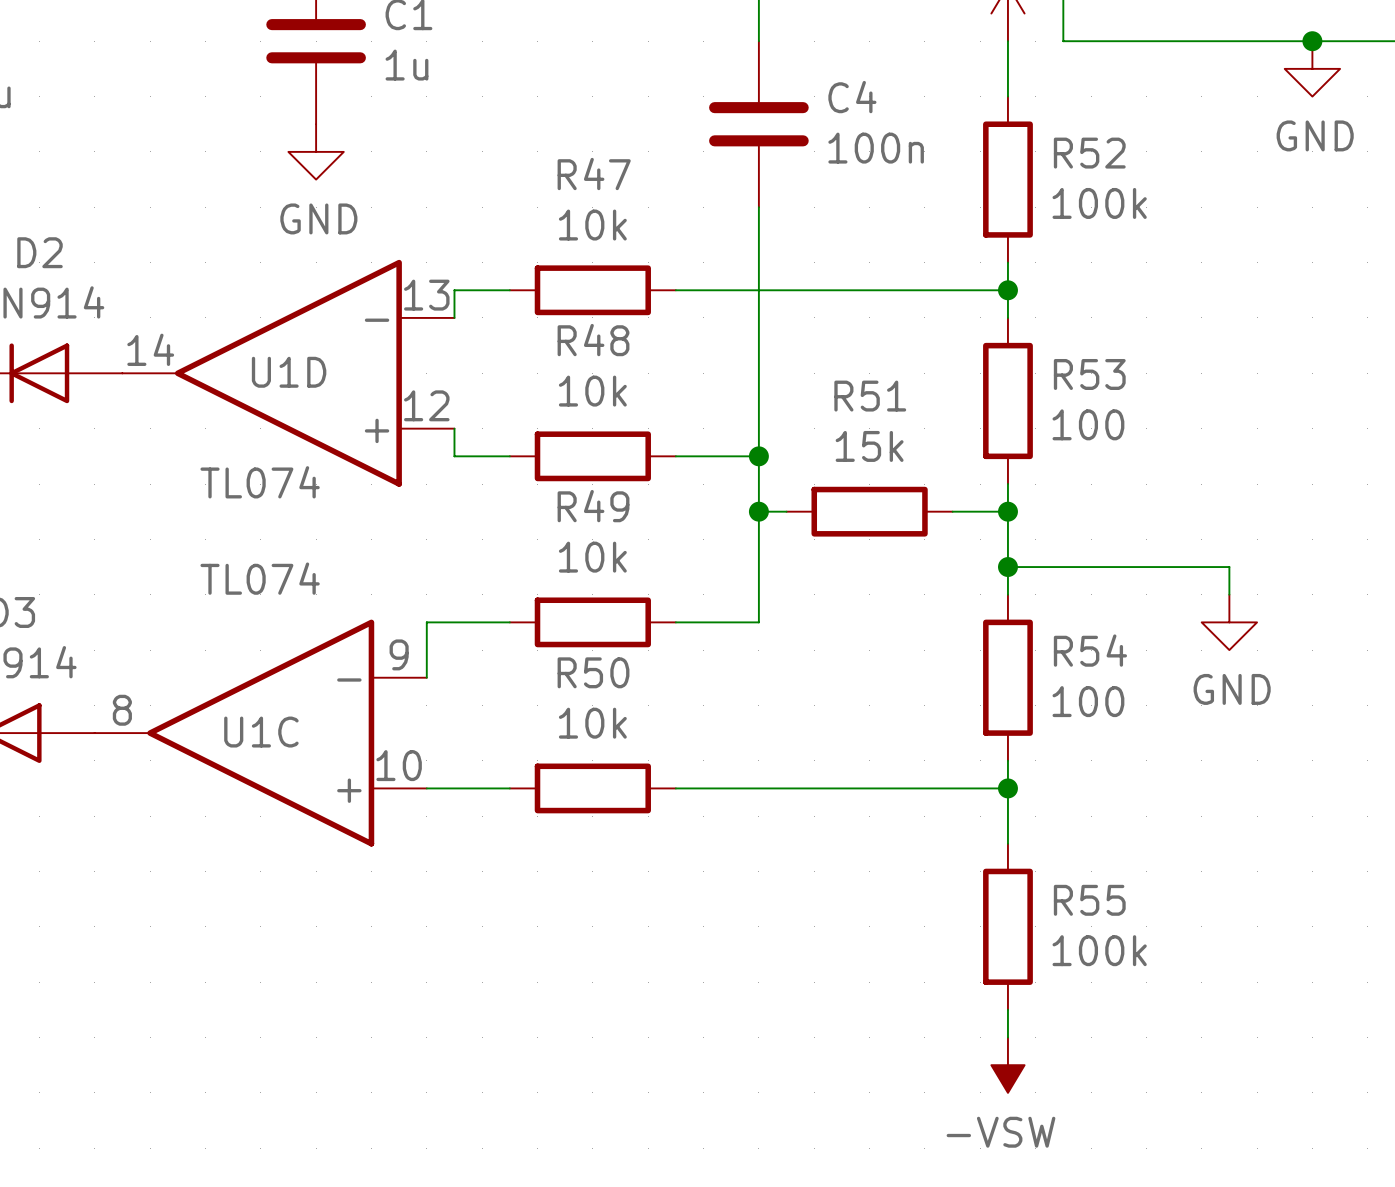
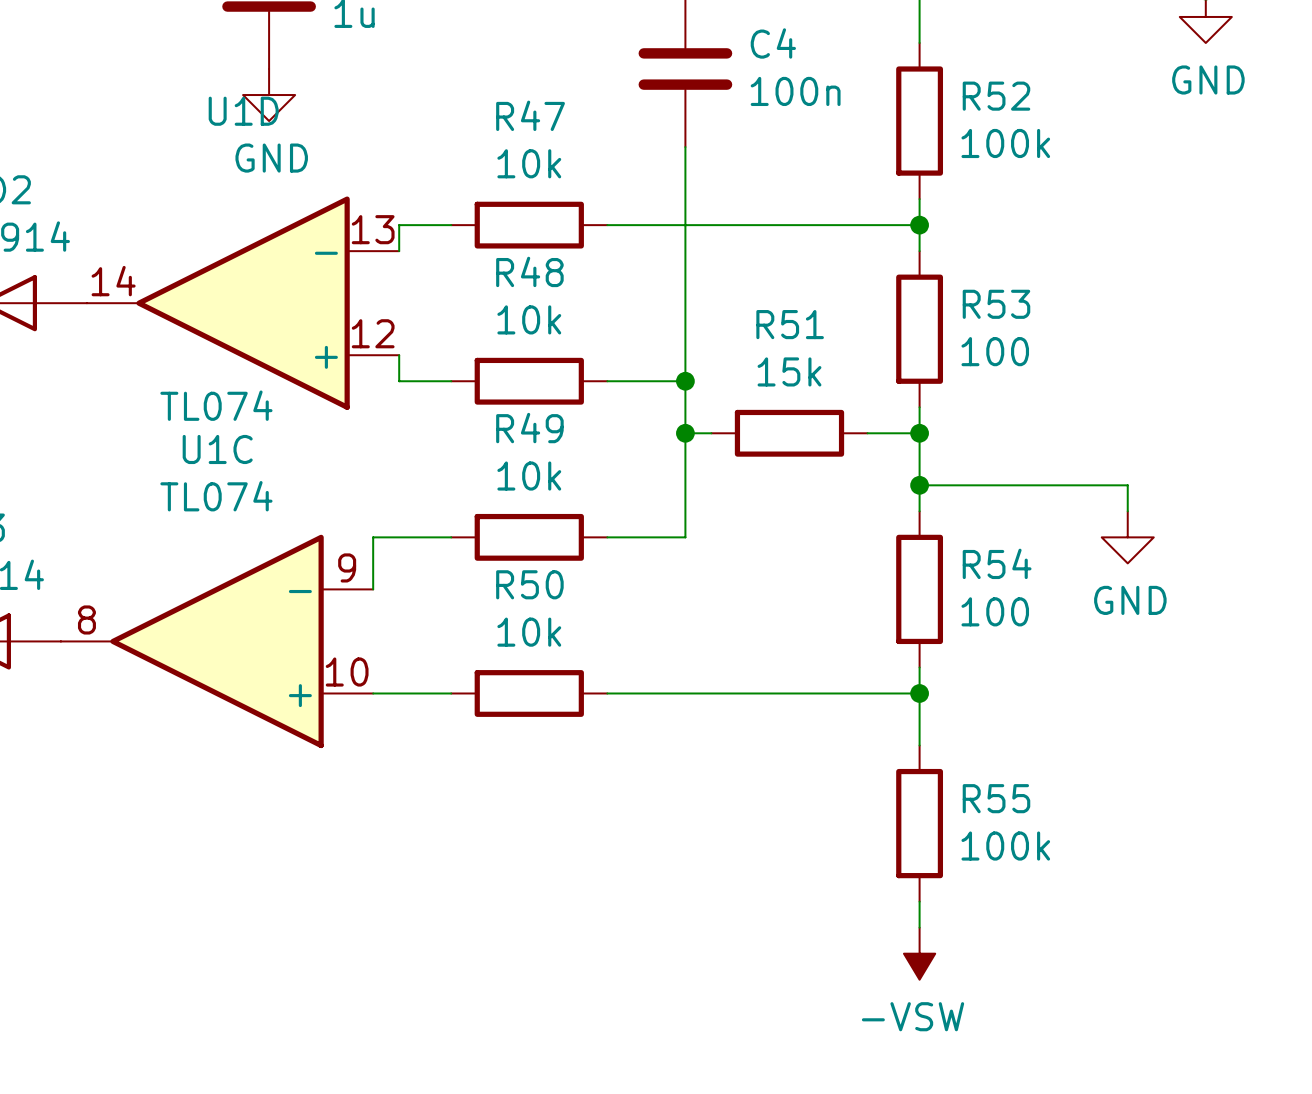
U1D name position: U1D (289, 372) -> U1D (243, 111)
U1C name position: U1C (261, 732) -> U1C (217, 449)

